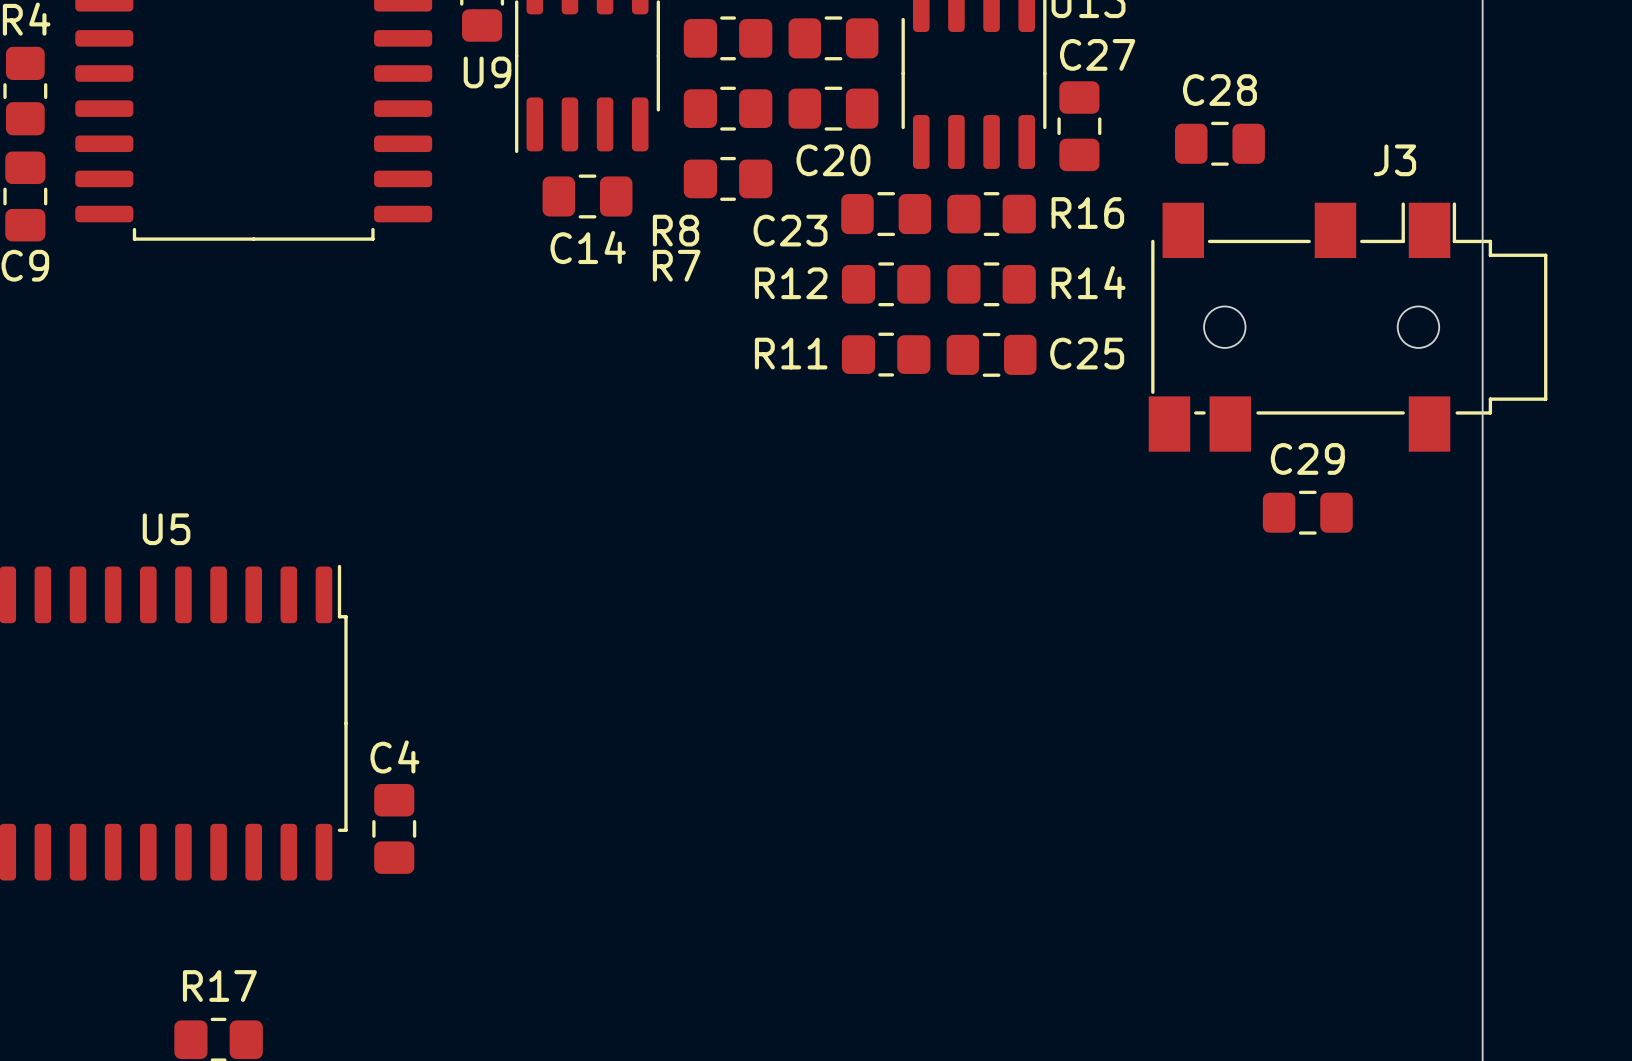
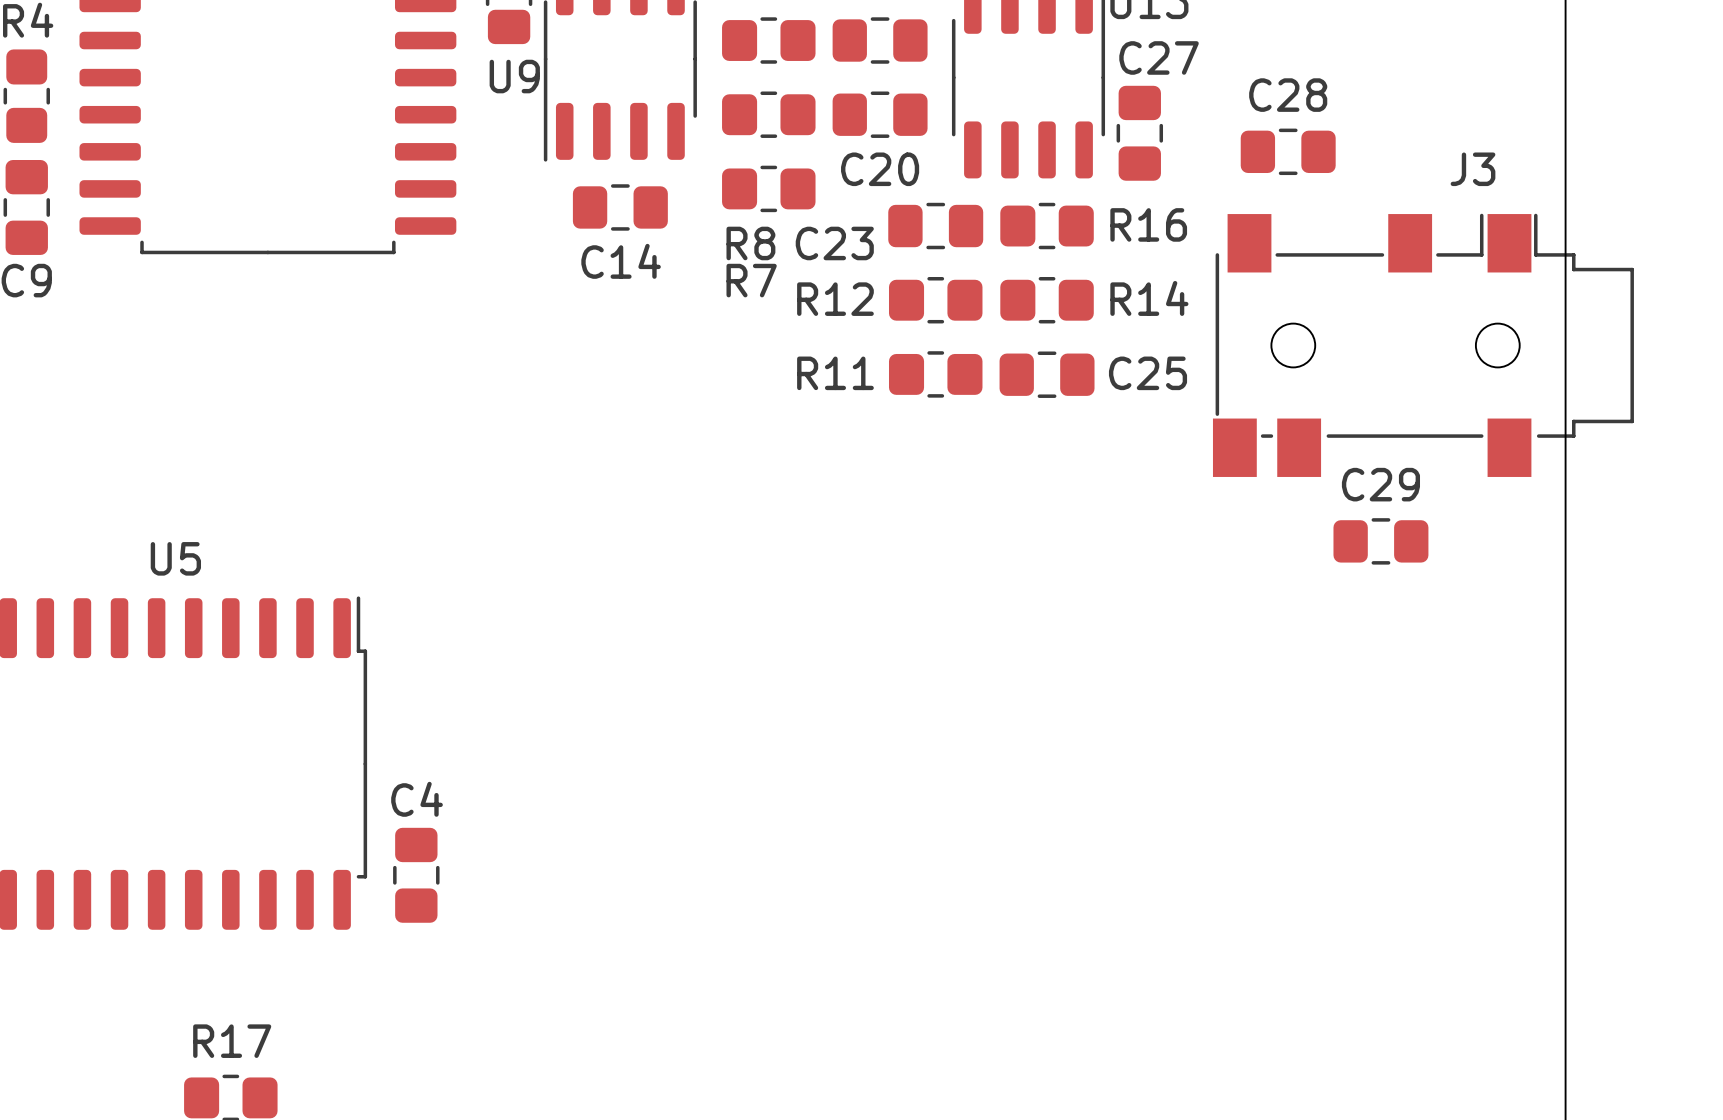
R8 name position: R8 (676, 230) -> R8 (750, 243)
R7 name position: R7 (676, 265) -> R7 (751, 280)

